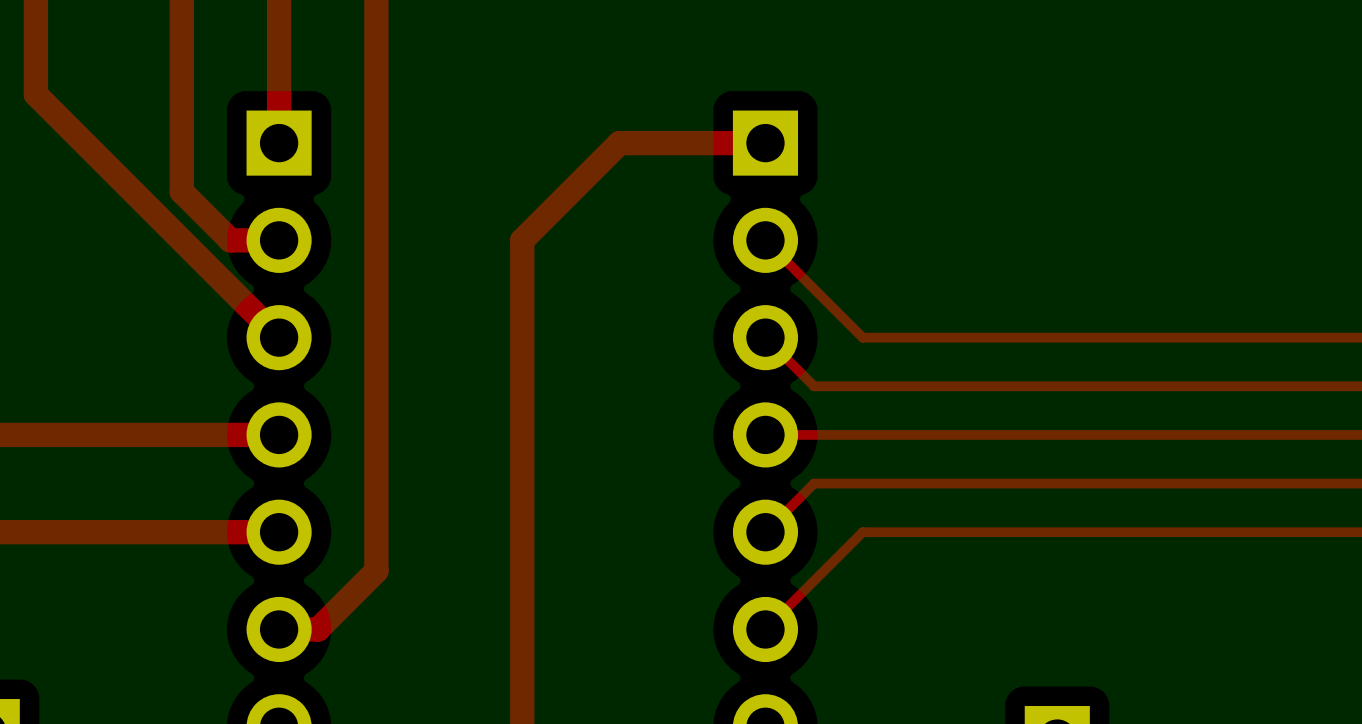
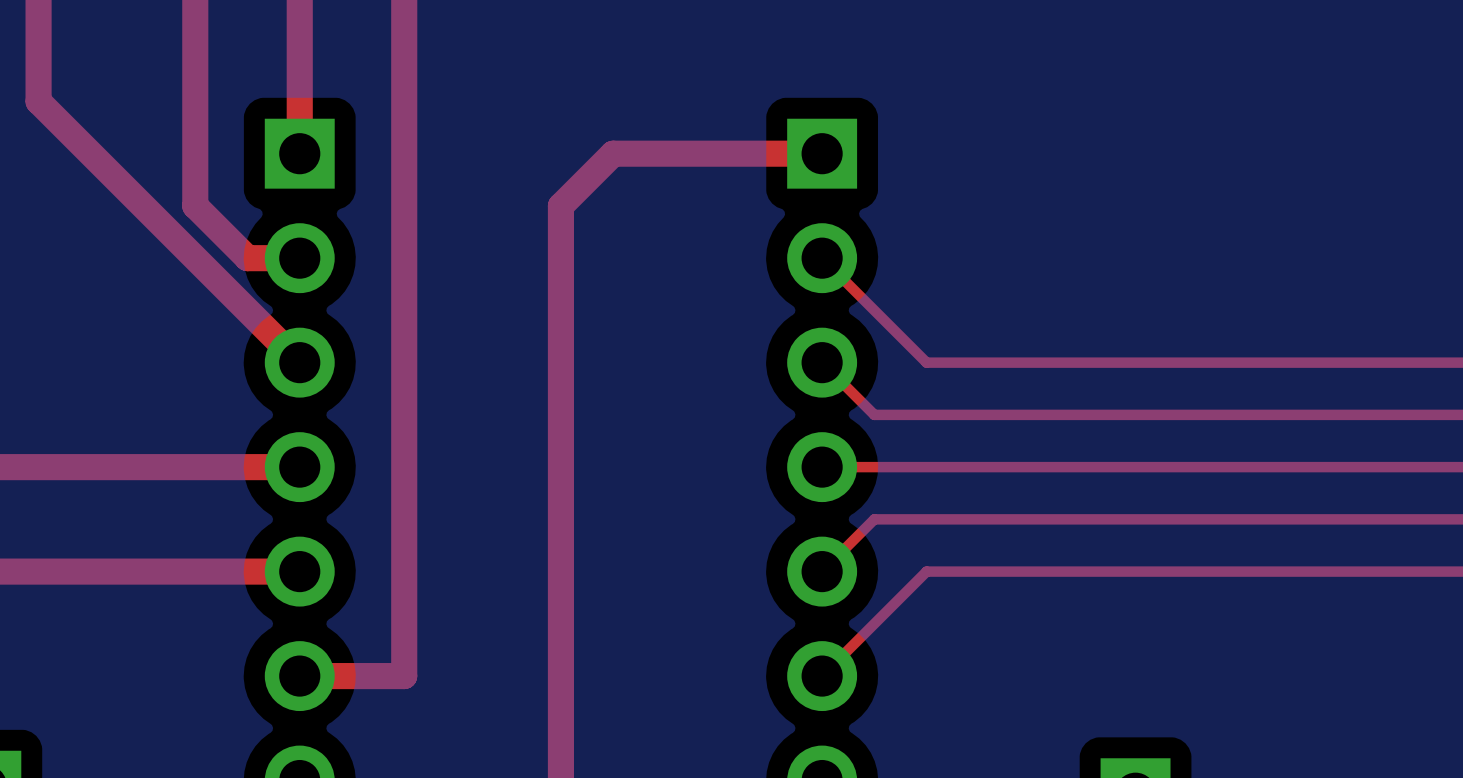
top track: (619, 143) (522, 240) -> (665, 153) (613, 153) (560, 205) (560, 258)
top track: (376, 571) (318, 629) -> (404, 613) (404, 676) (341, 676)

